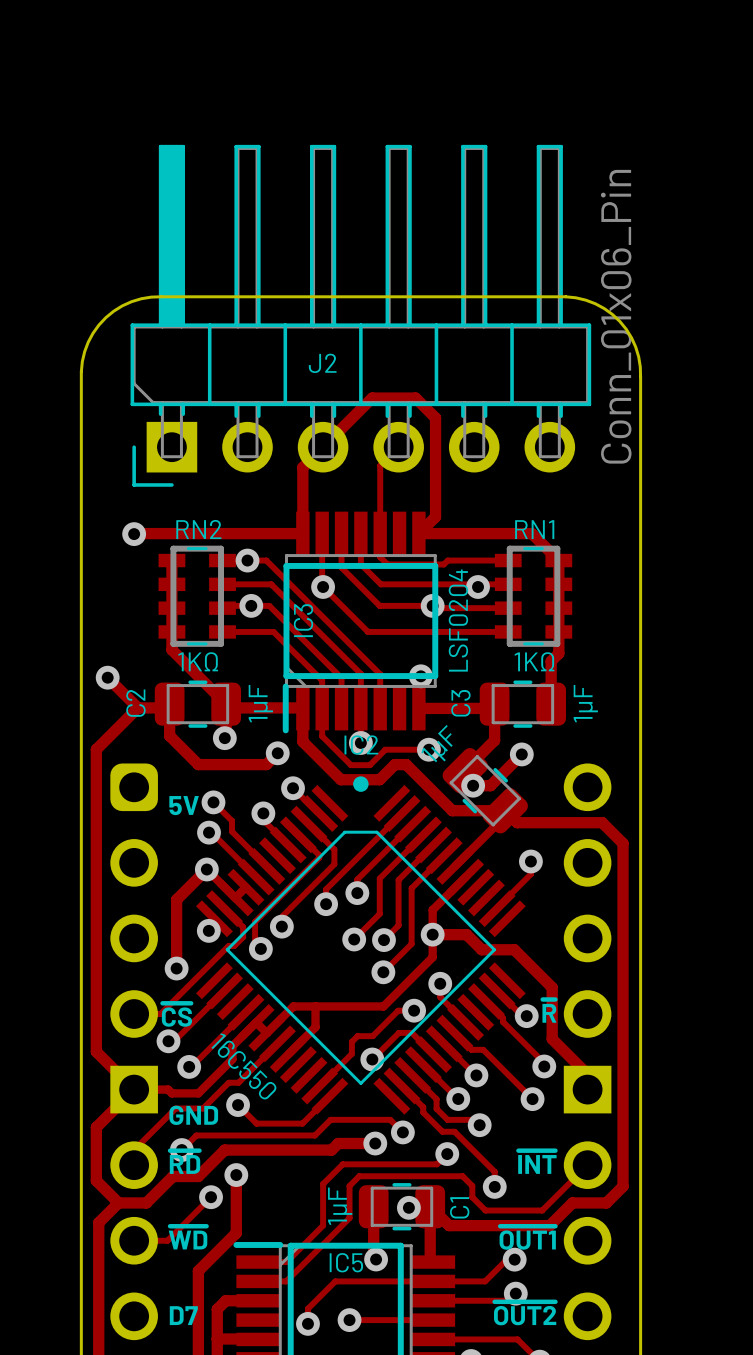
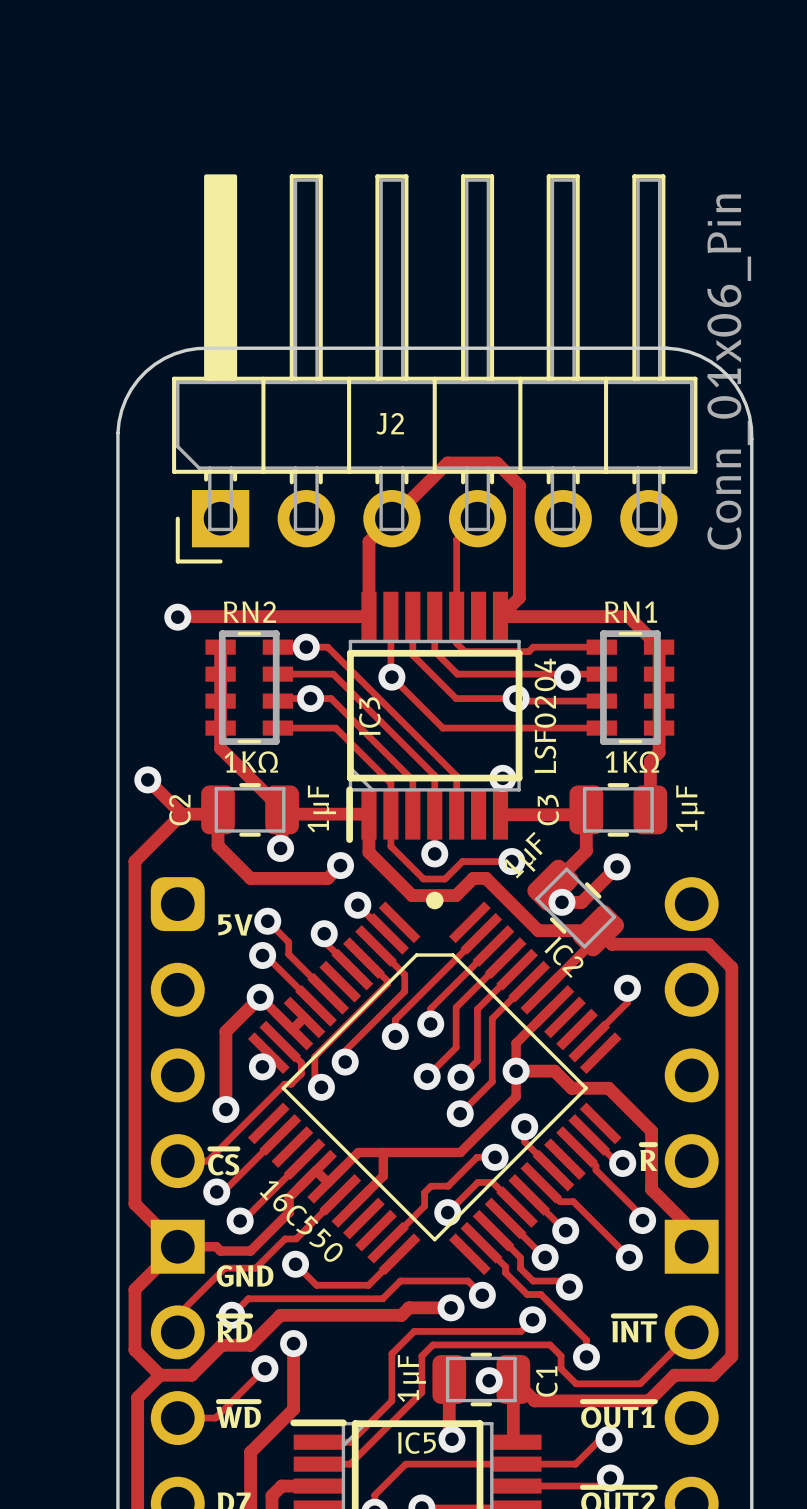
J2 footprint: [130, 144, 592, 487] -> [172, 174, 698, 564]
IC2 name rotation: 0° (361, 745) -> 45° clockwise (563, 957)
IC2 name position: IC2 (361, 745) -> IC2 (563, 957)

